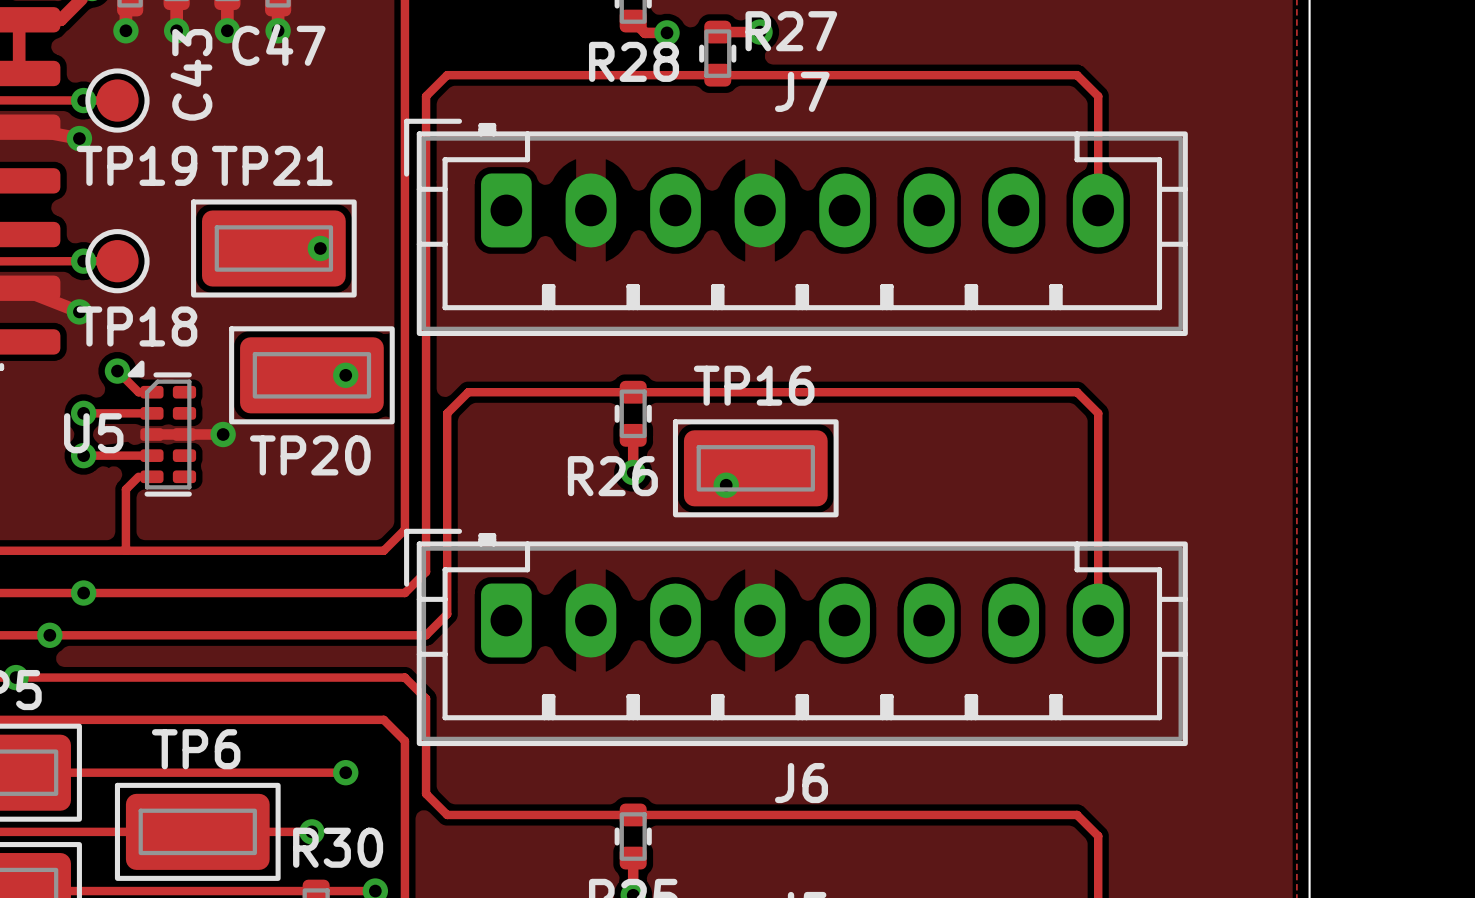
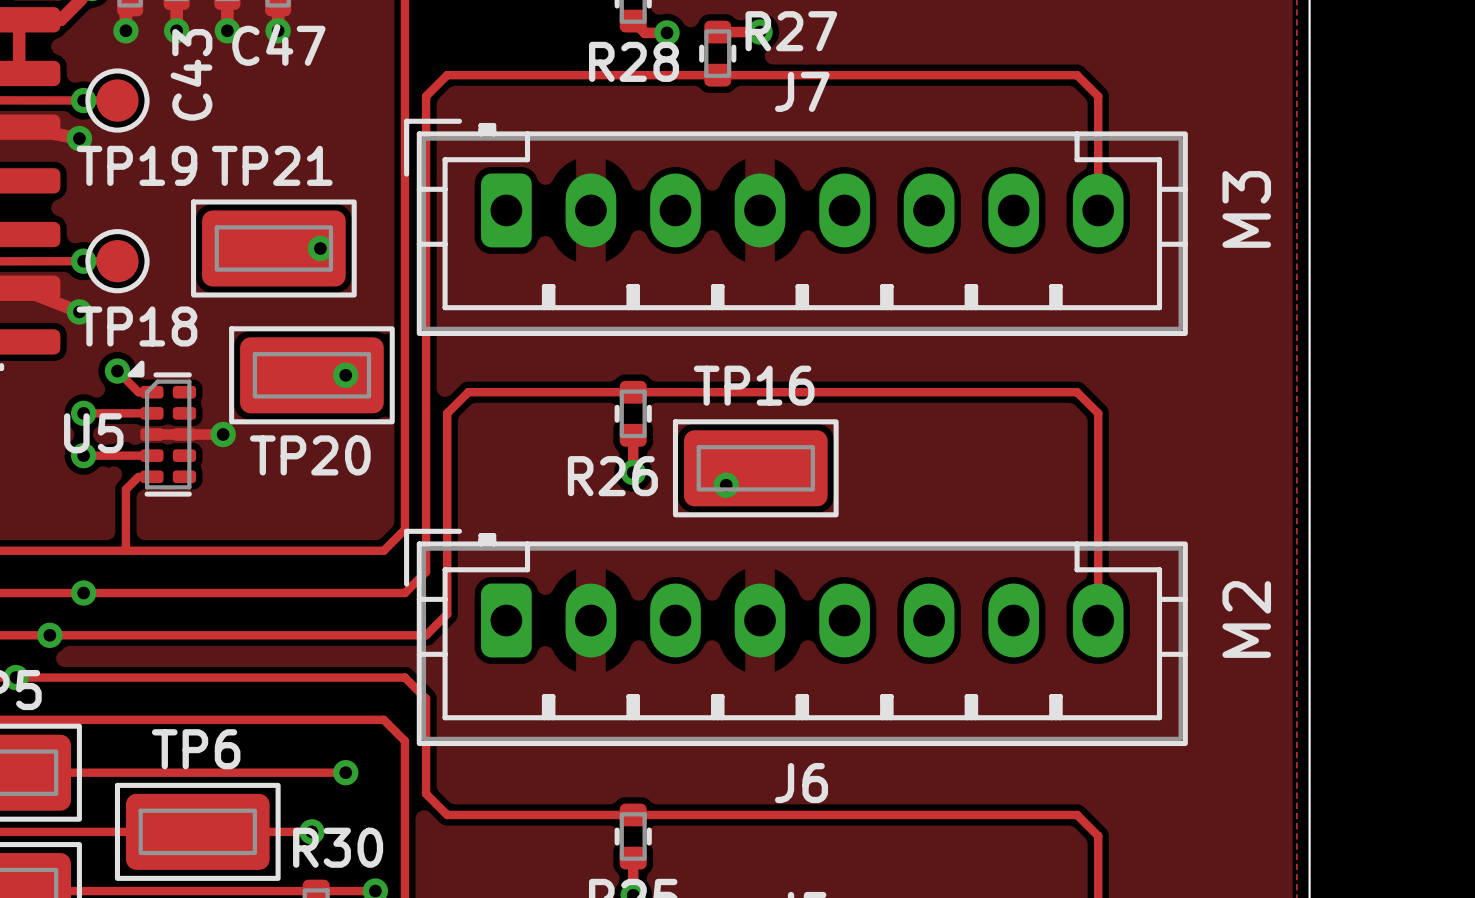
text: none -> M3 (1246, 209)
text: none -> M2 (1246, 619)

